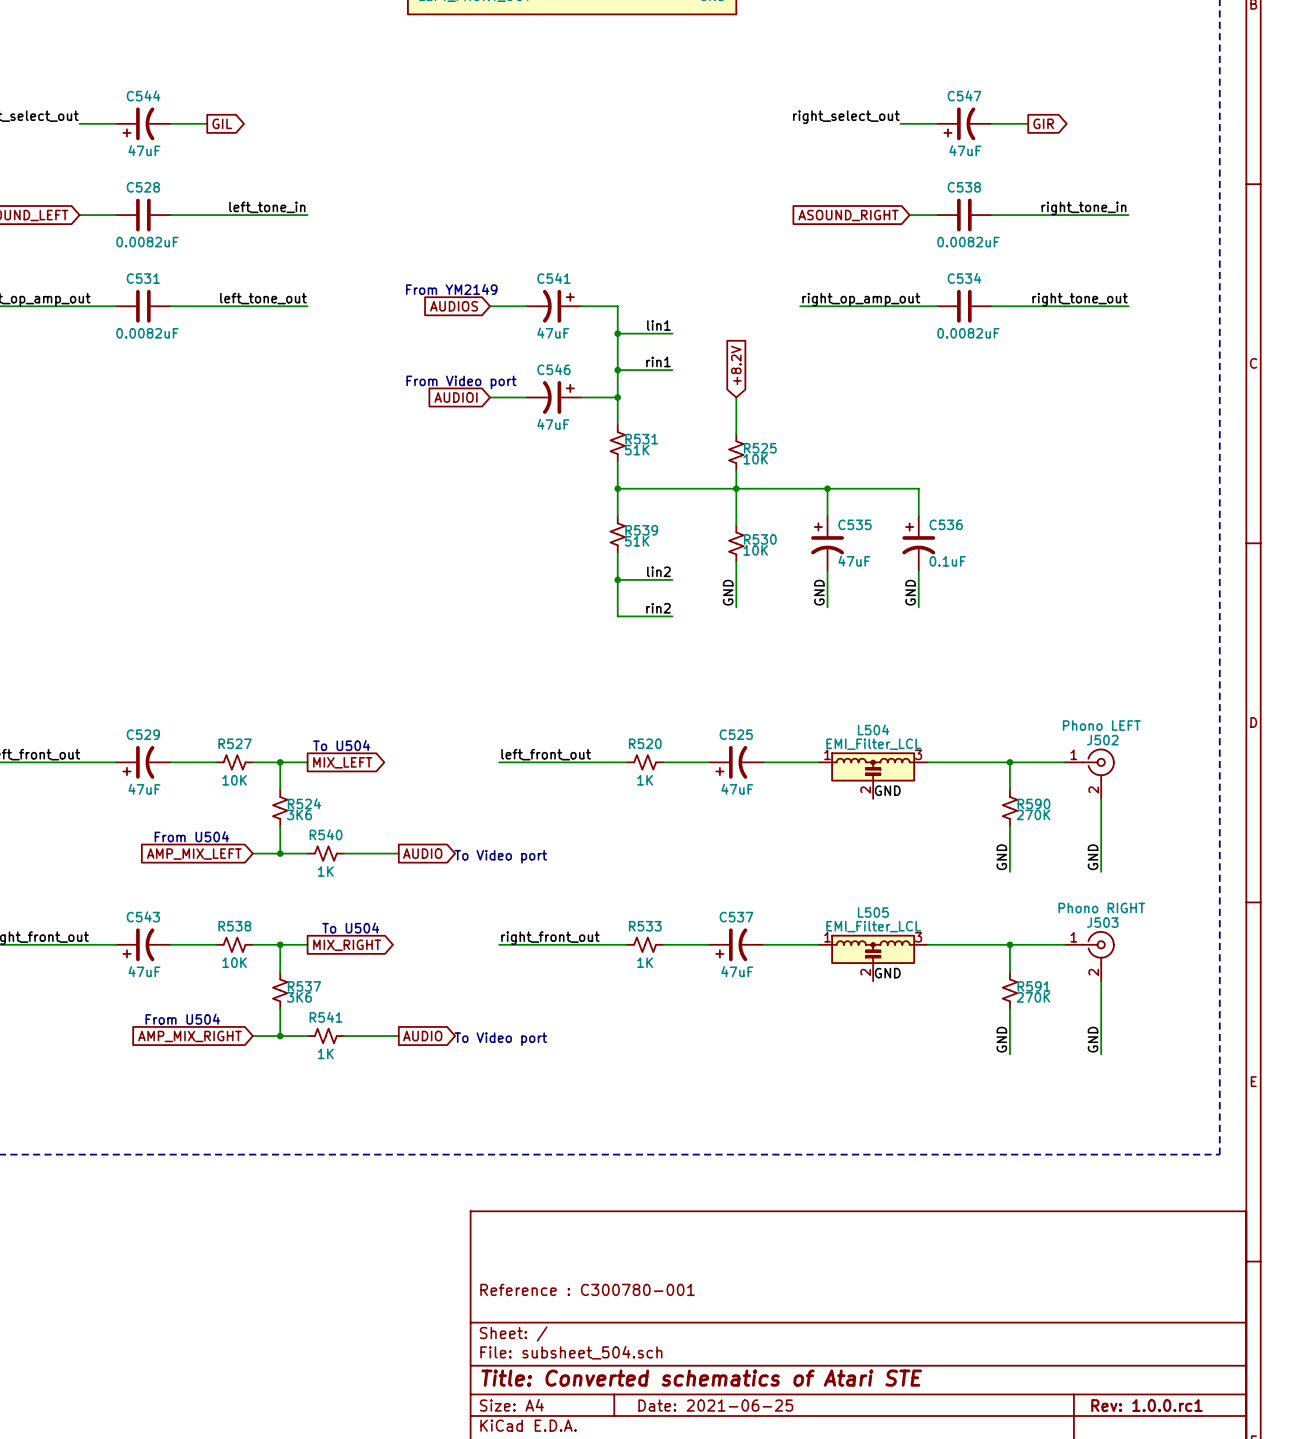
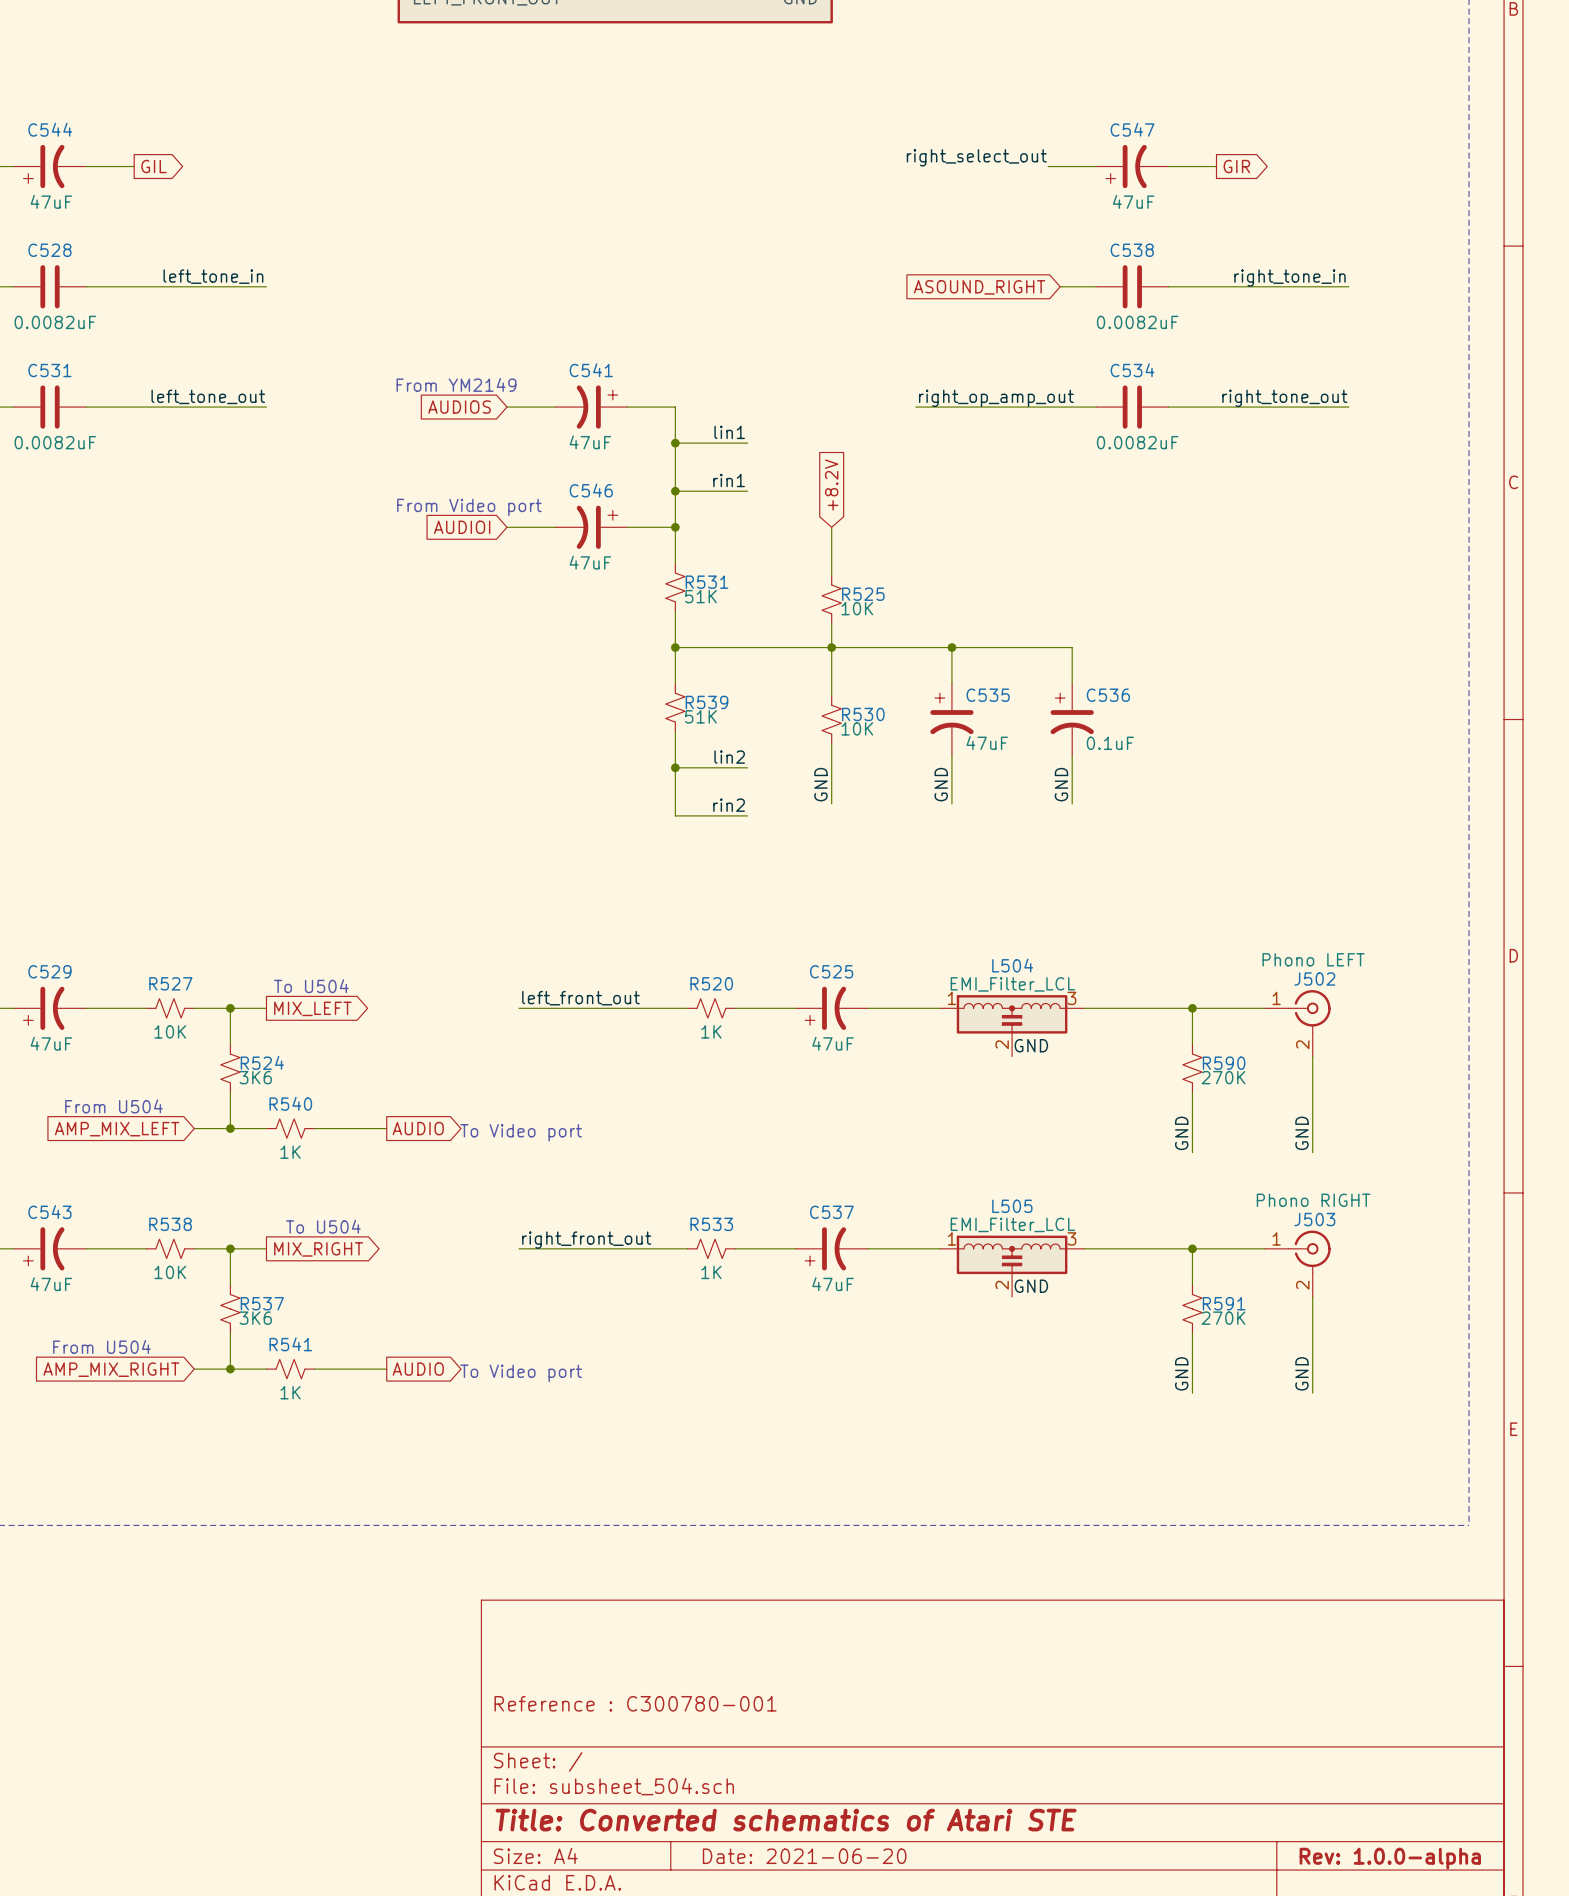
title block: Date: 2021-06-25 (715, 1405) -> Date: 2021-06-20 (804, 1856)
title block: Rev: 1.0.0.rc1 (1146, 1405) -> Rev: 1.0.0-alpha (1390, 1858)

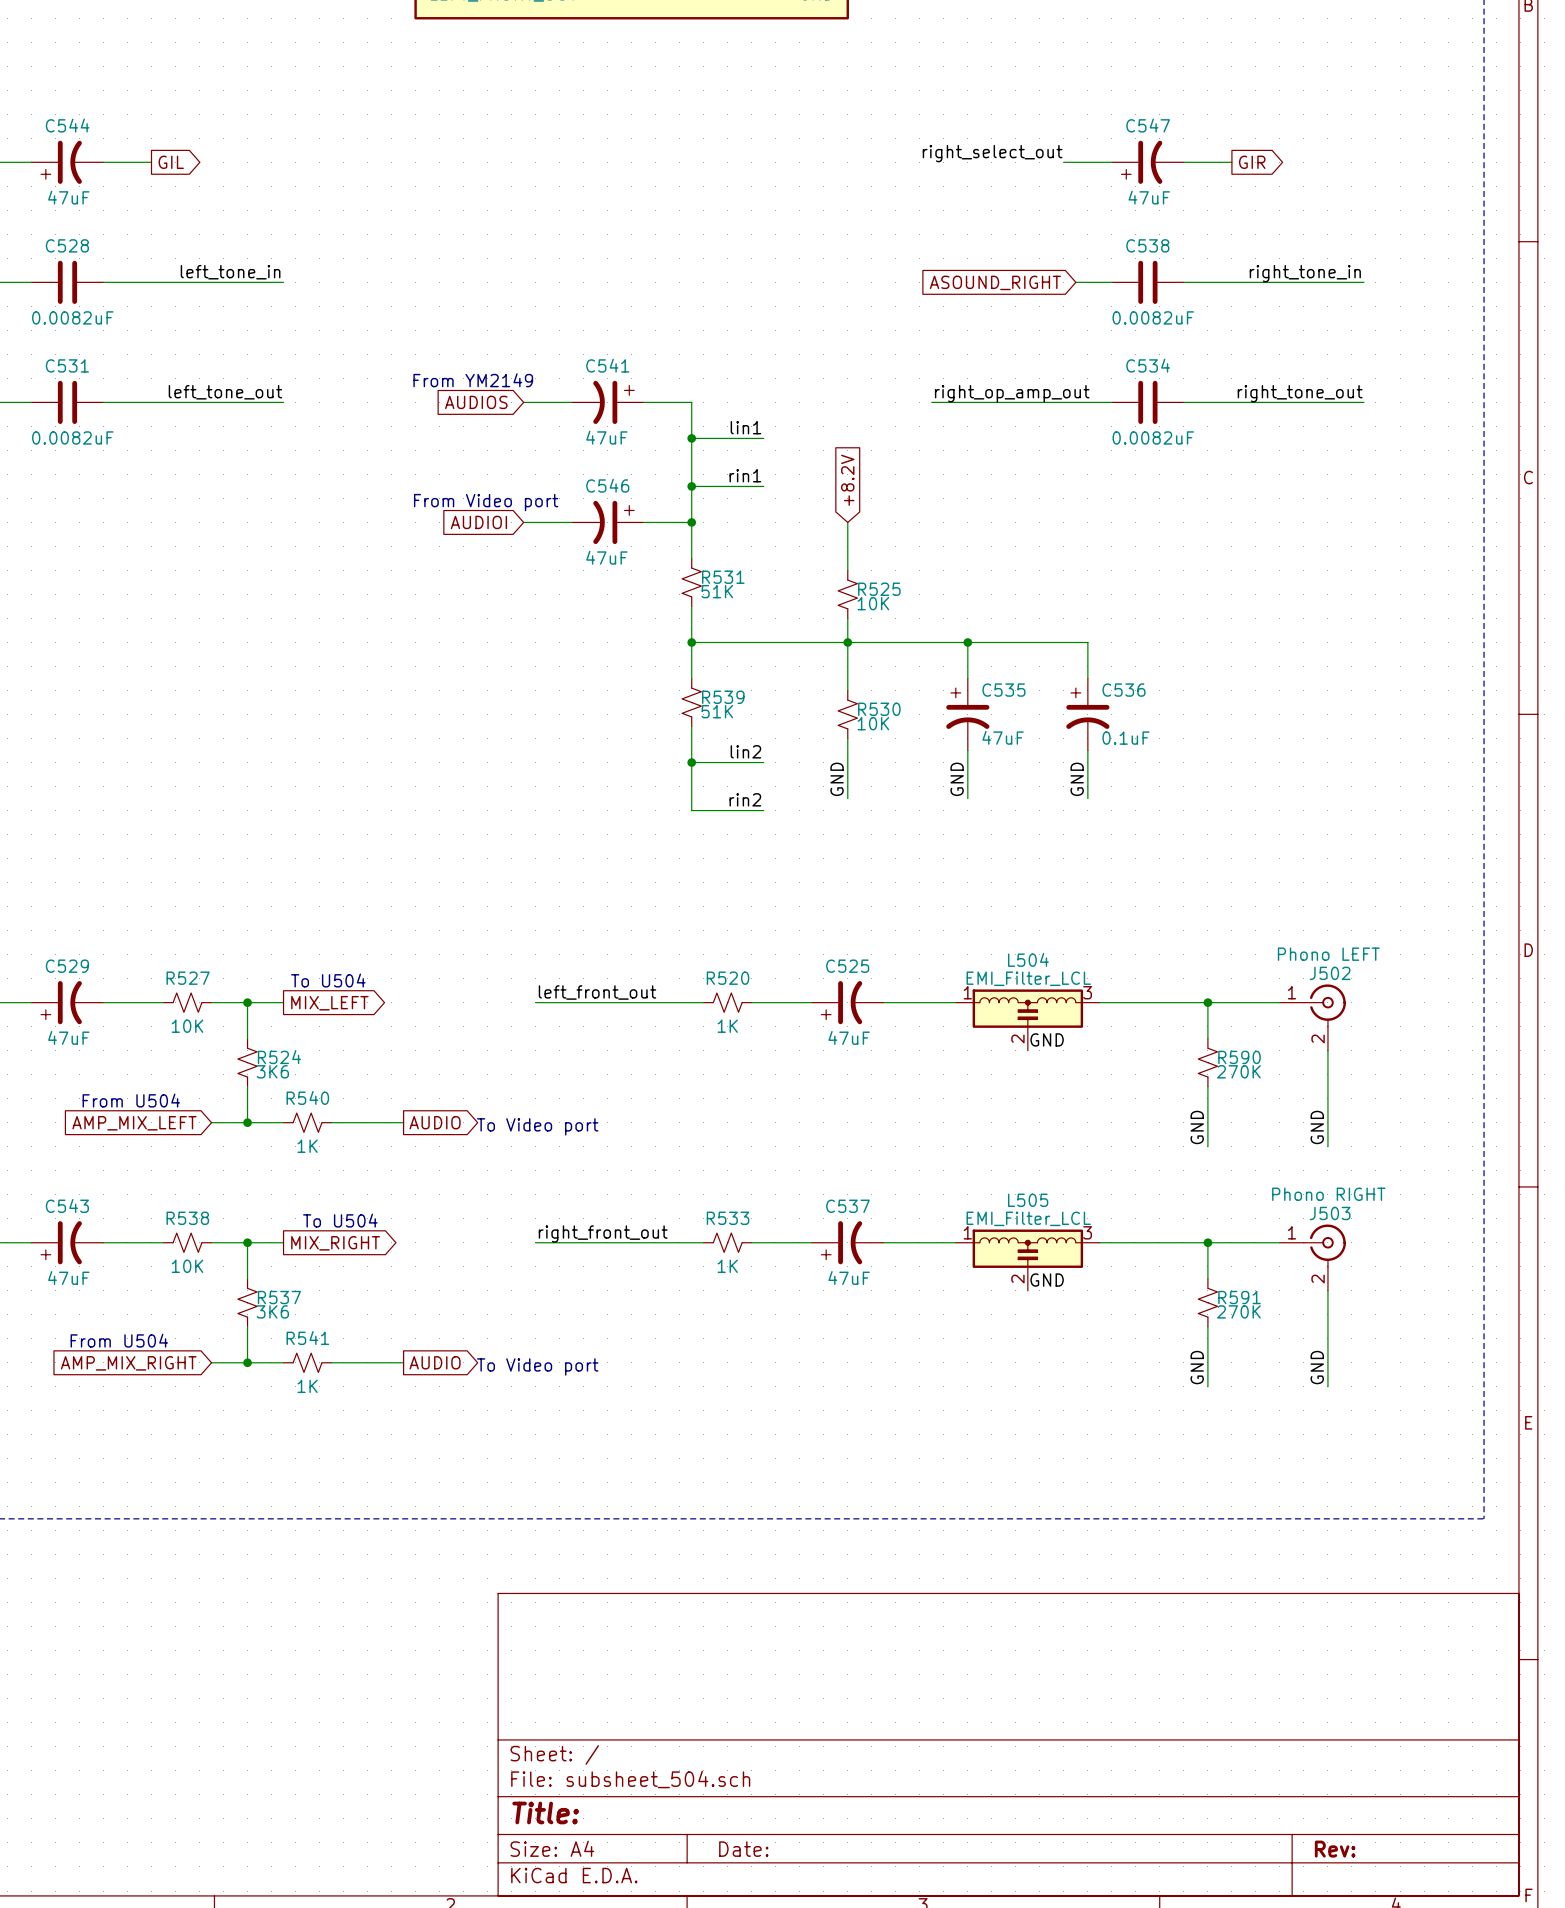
title block: Reference : C300780-001 (635, 1703) -> none
title block: Title: Converted schematics of Atari STE (786, 1820) -> Title: (545, 1812)
title block: Date: 2021-06-20 (804, 1856) -> Date: (743, 1849)
title block: Rev: 1.0.0-alpha (1390, 1858) -> Rev: (1335, 1849)

